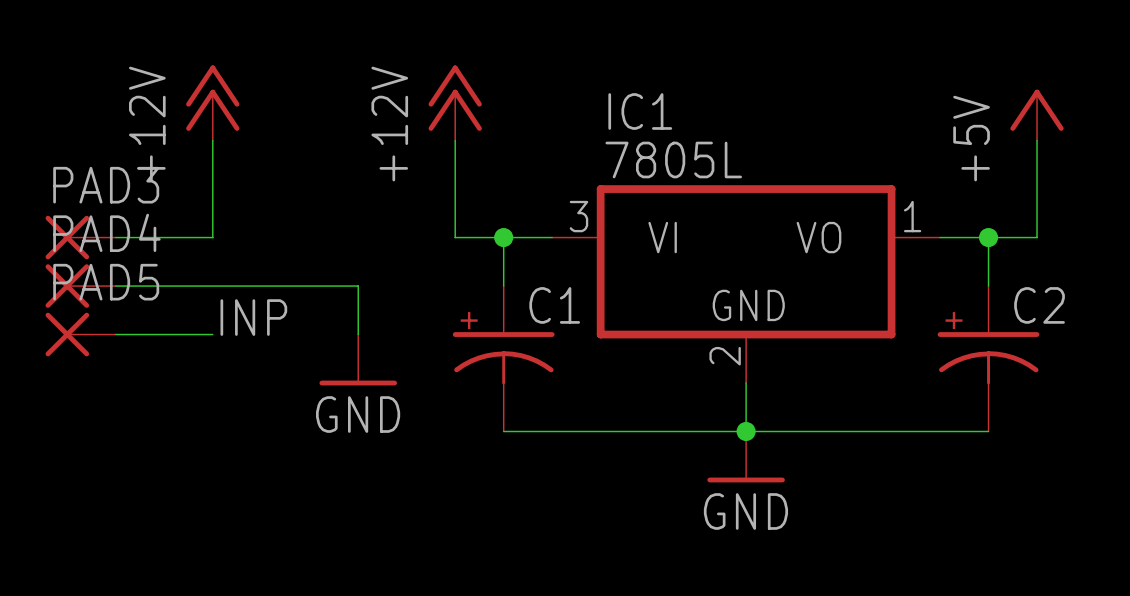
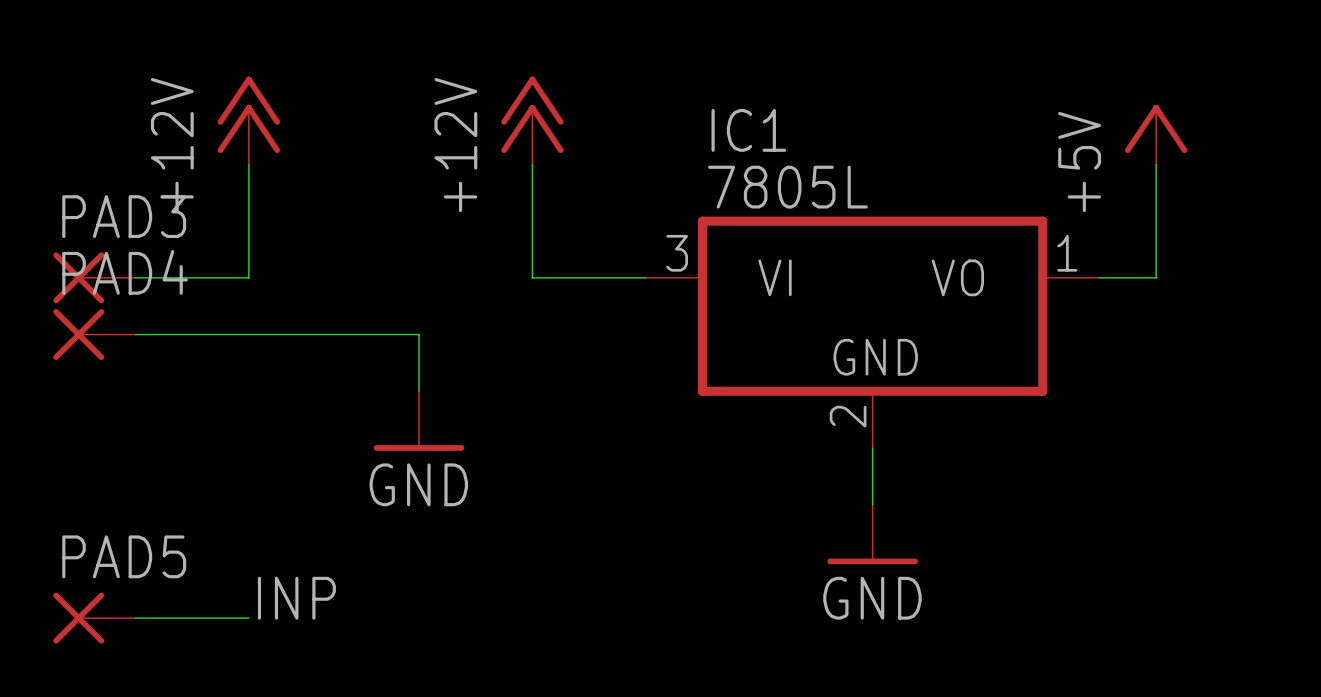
power symbol position: +5V (1037, 115) -> +5V (1156, 134)
wire: none -> (1156, 164) (1156, 277)
wire: (1037, 140) (1037, 237) (988, 237) (988, 286) -> none
wire: (503, 237) (503, 286) -> none
junction: (503, 237) -> none
junction: (988, 237) -> none
label position: INP (253, 317) -> INP (296, 598)
PAD5 position: (80, 334) -> (94, 618)
wire: (115, 334) (212, 334) -> (135, 618) (248, 618)
C1: (503, 358) -> none
C2: (988, 358) -> none
wire: (503, 431) (988, 431) -> none
junction: (746, 431) -> none

